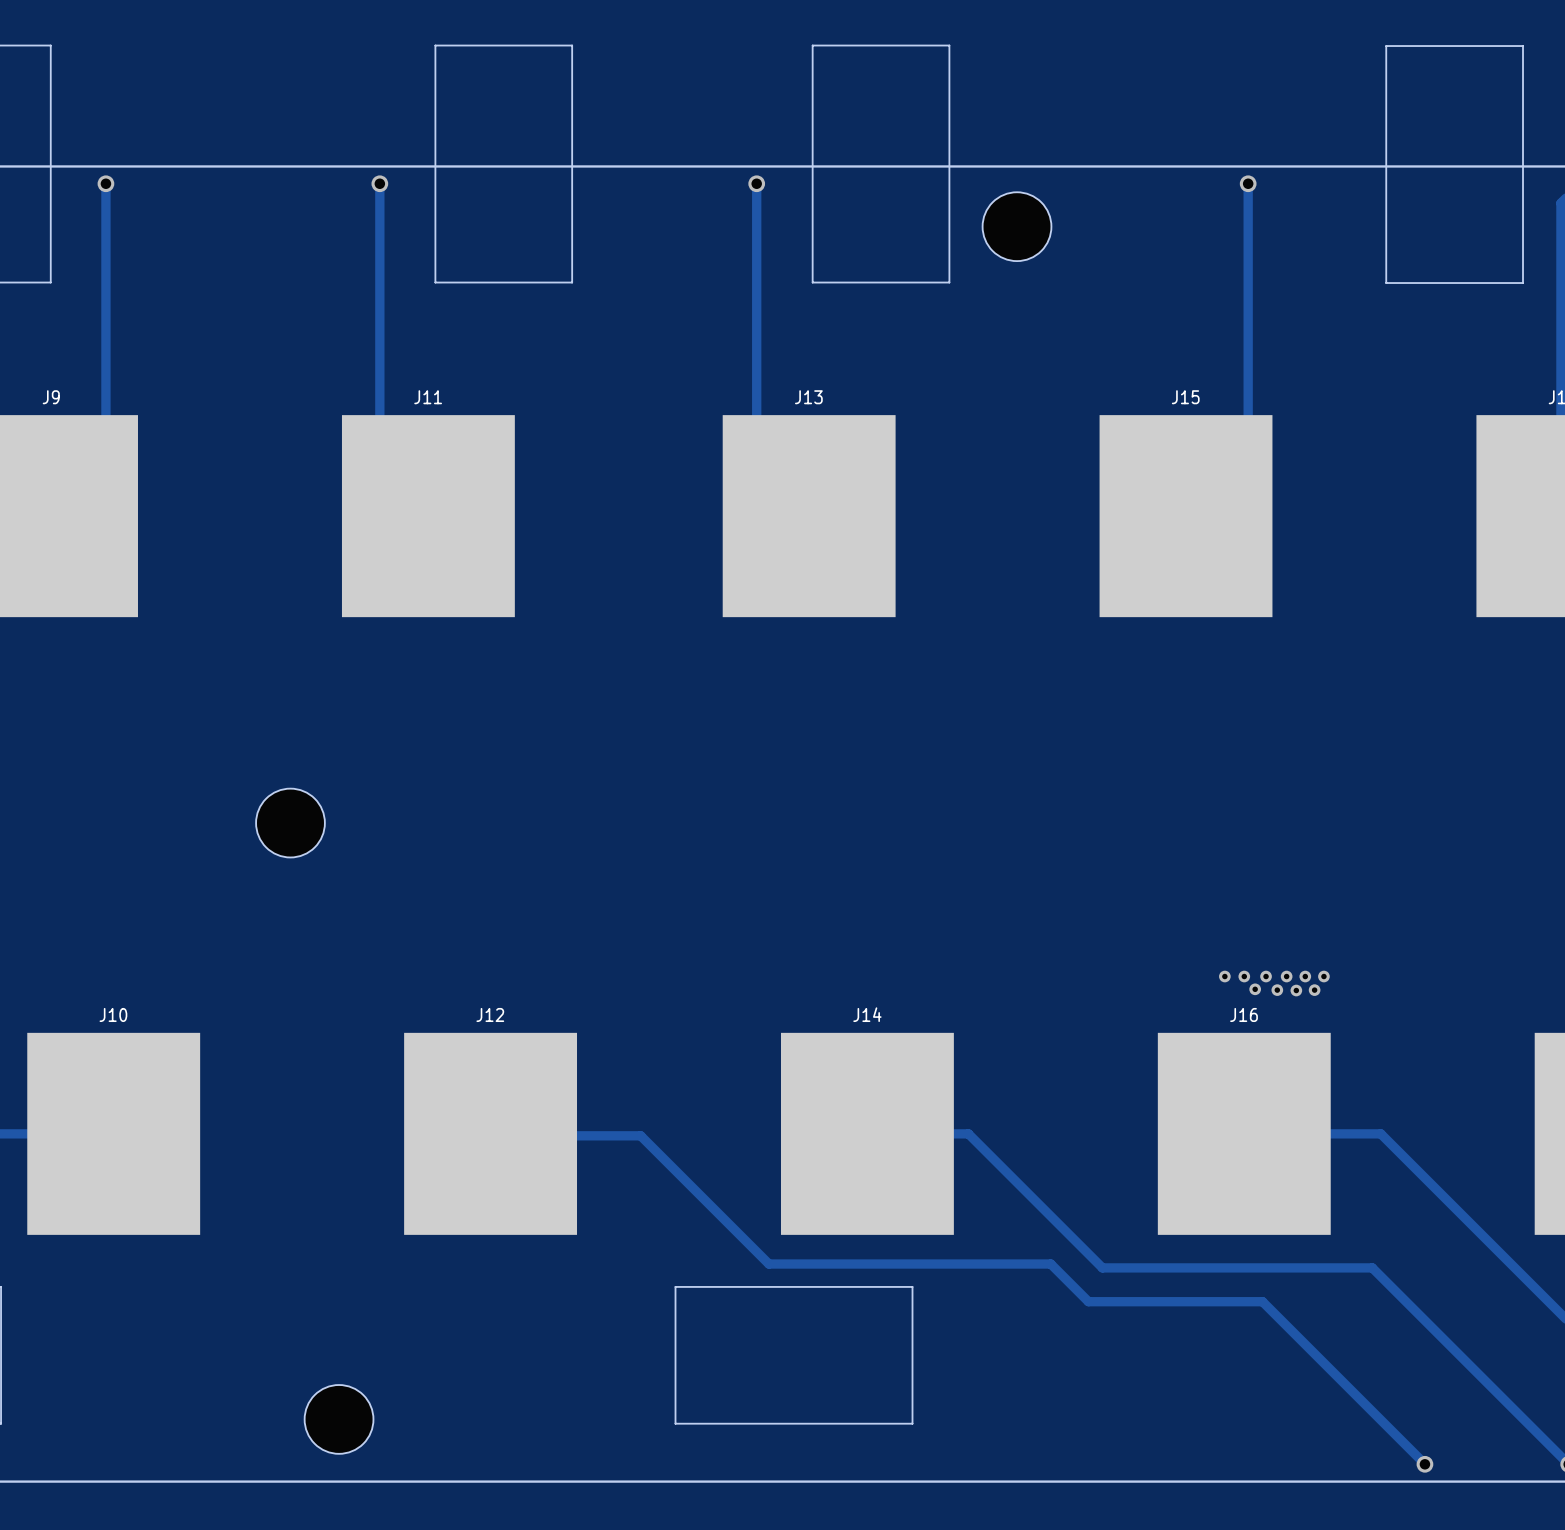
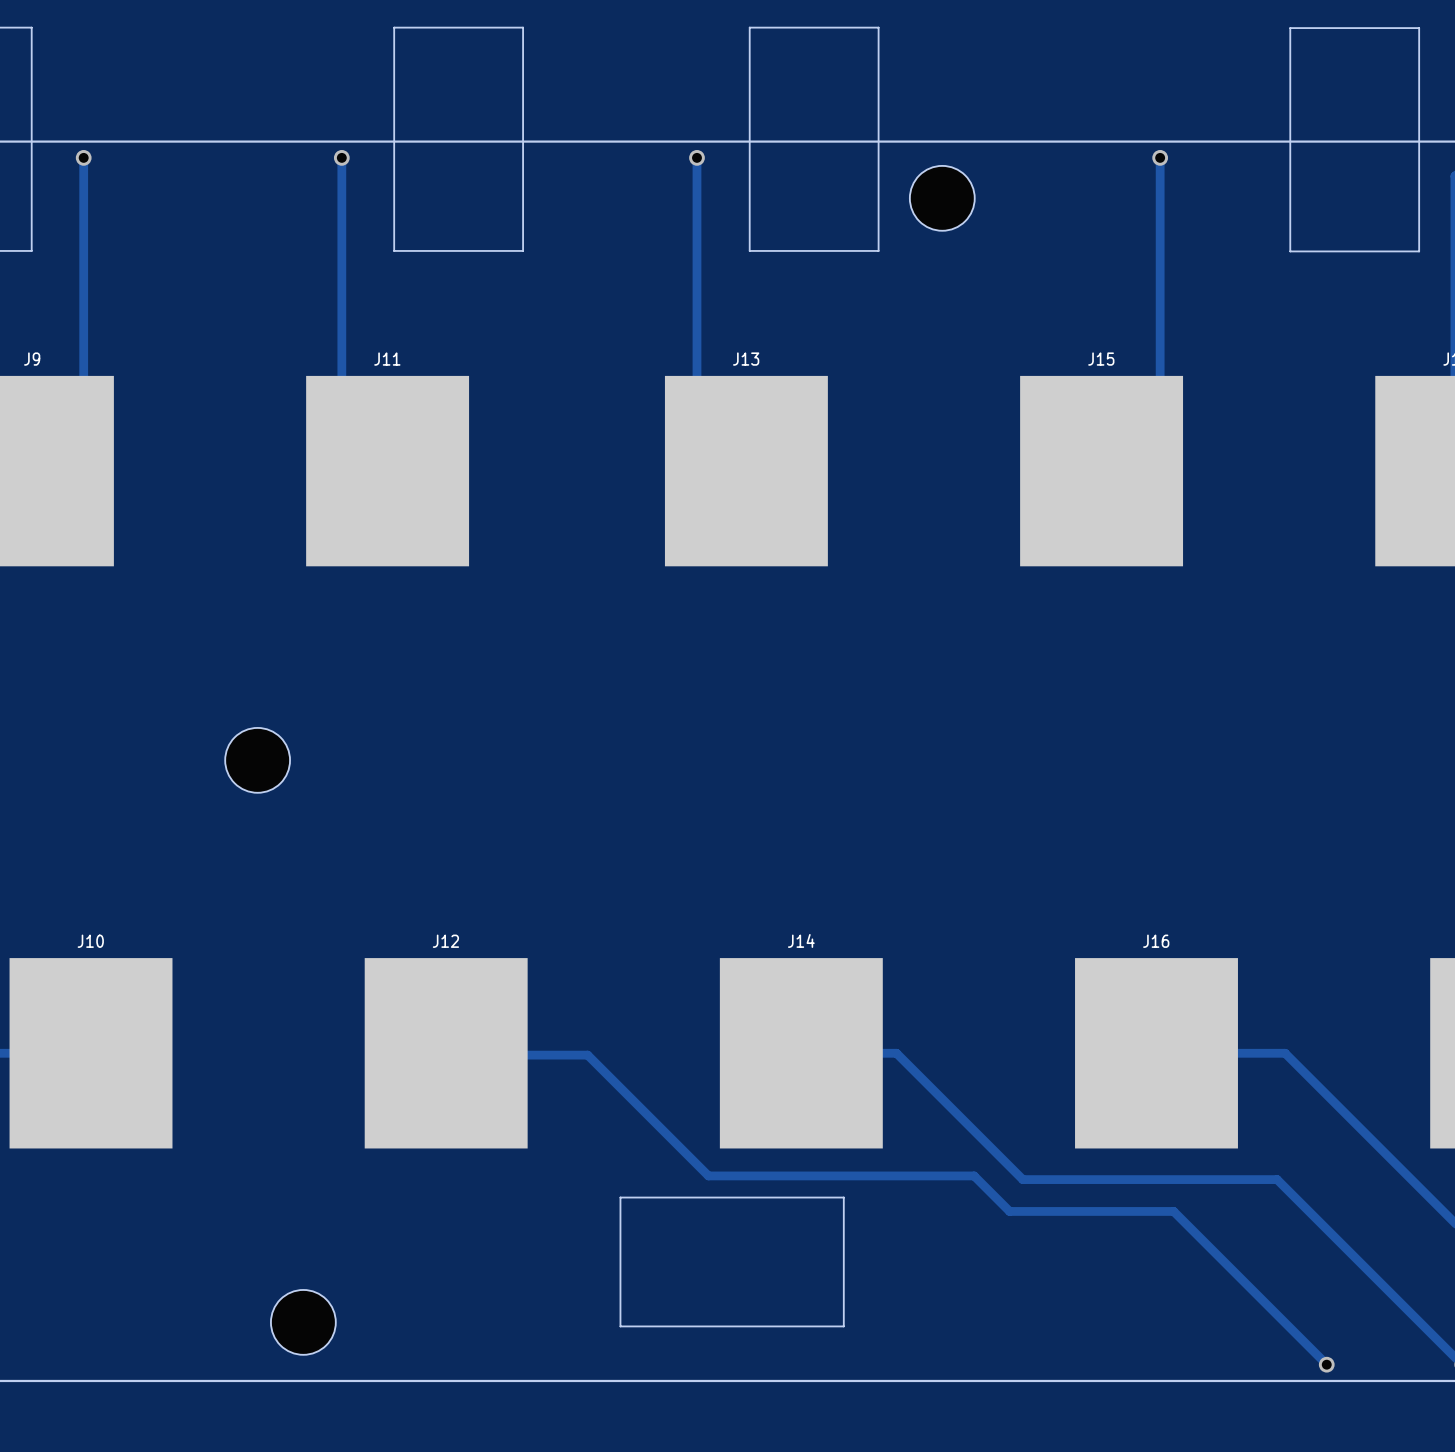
via: (1224, 976) -> none
via: (1244, 976) -> none
via: (1266, 976) -> none
via: (1286, 976) -> none
via: (1305, 976) -> none
via: (1323, 976) -> none
via: (1255, 989) -> none
via: (1277, 990) -> none
via: (1296, 990) -> none
via: (1314, 990) -> none

